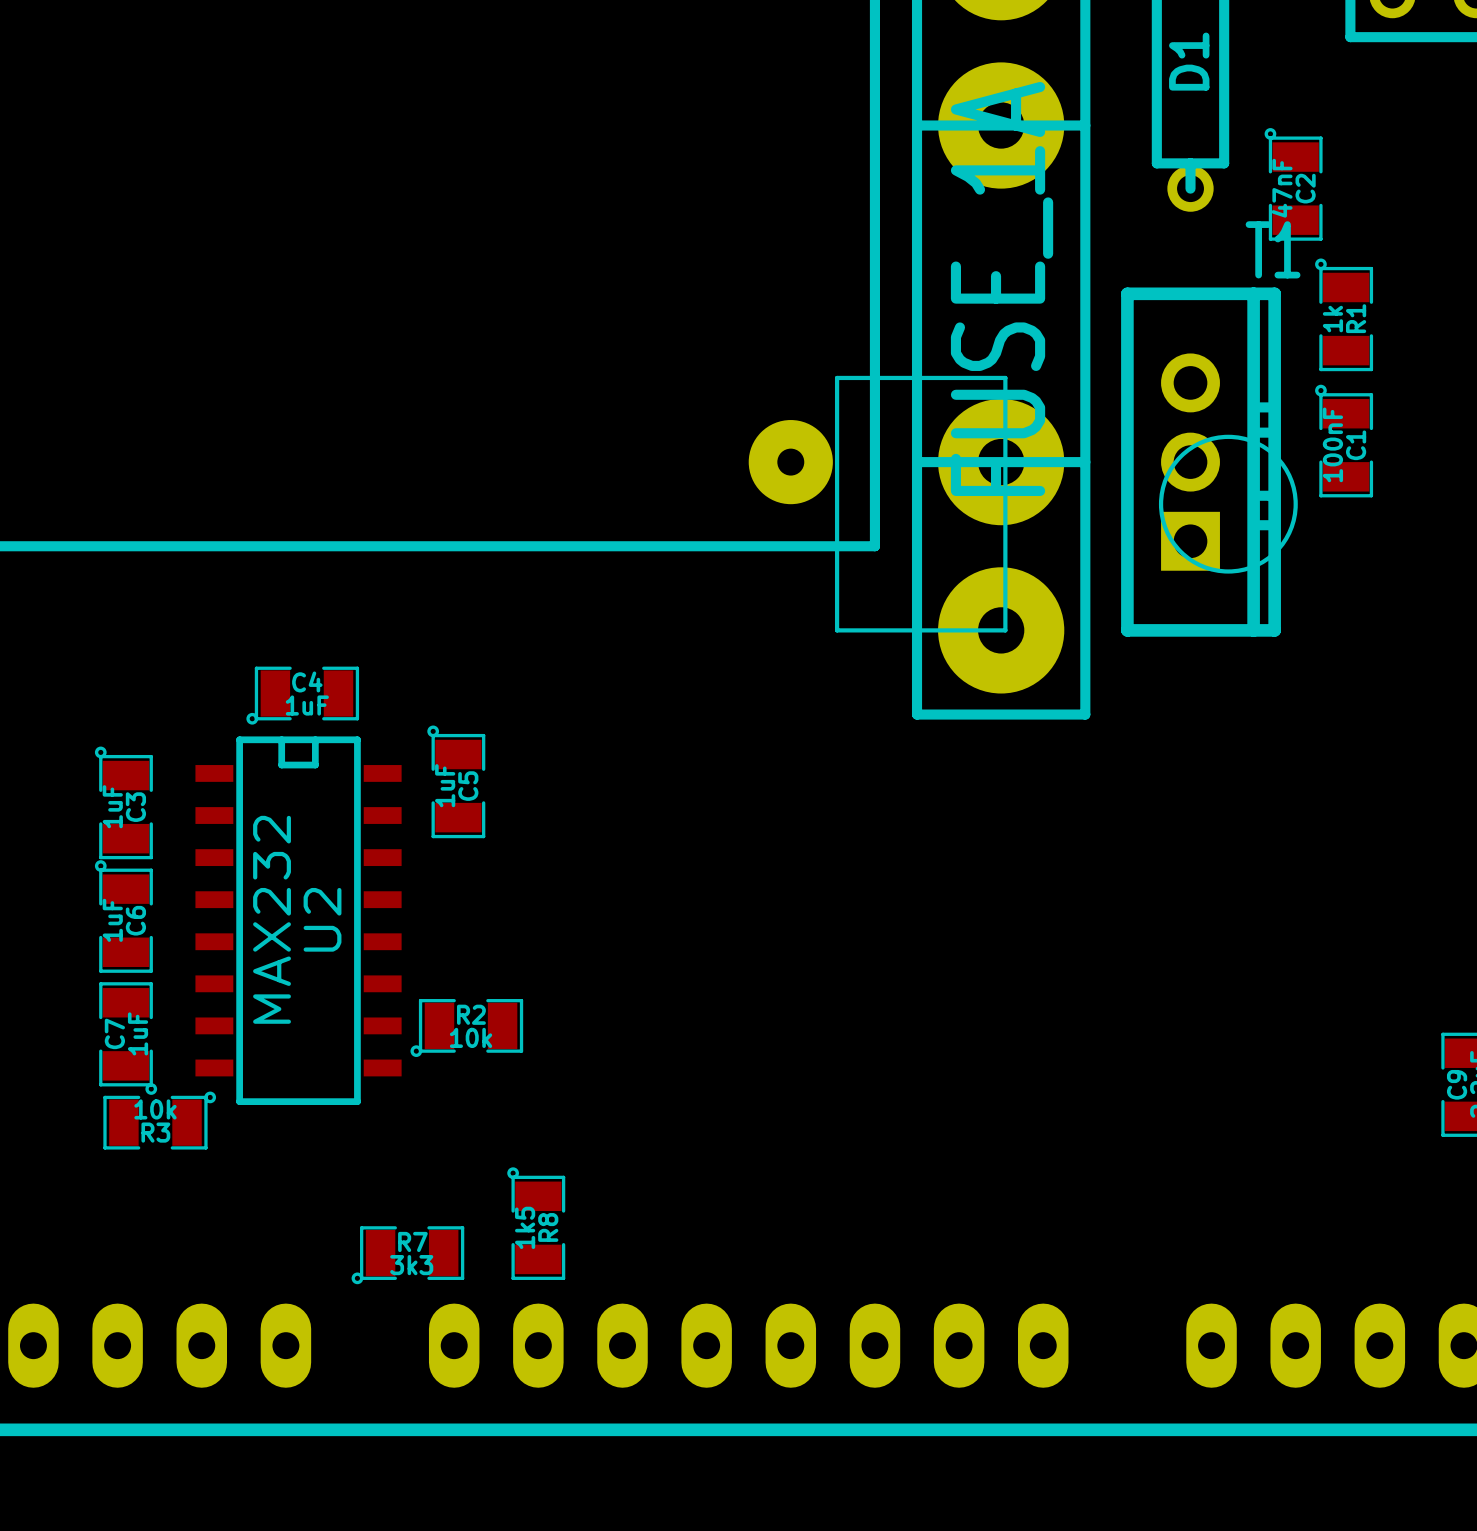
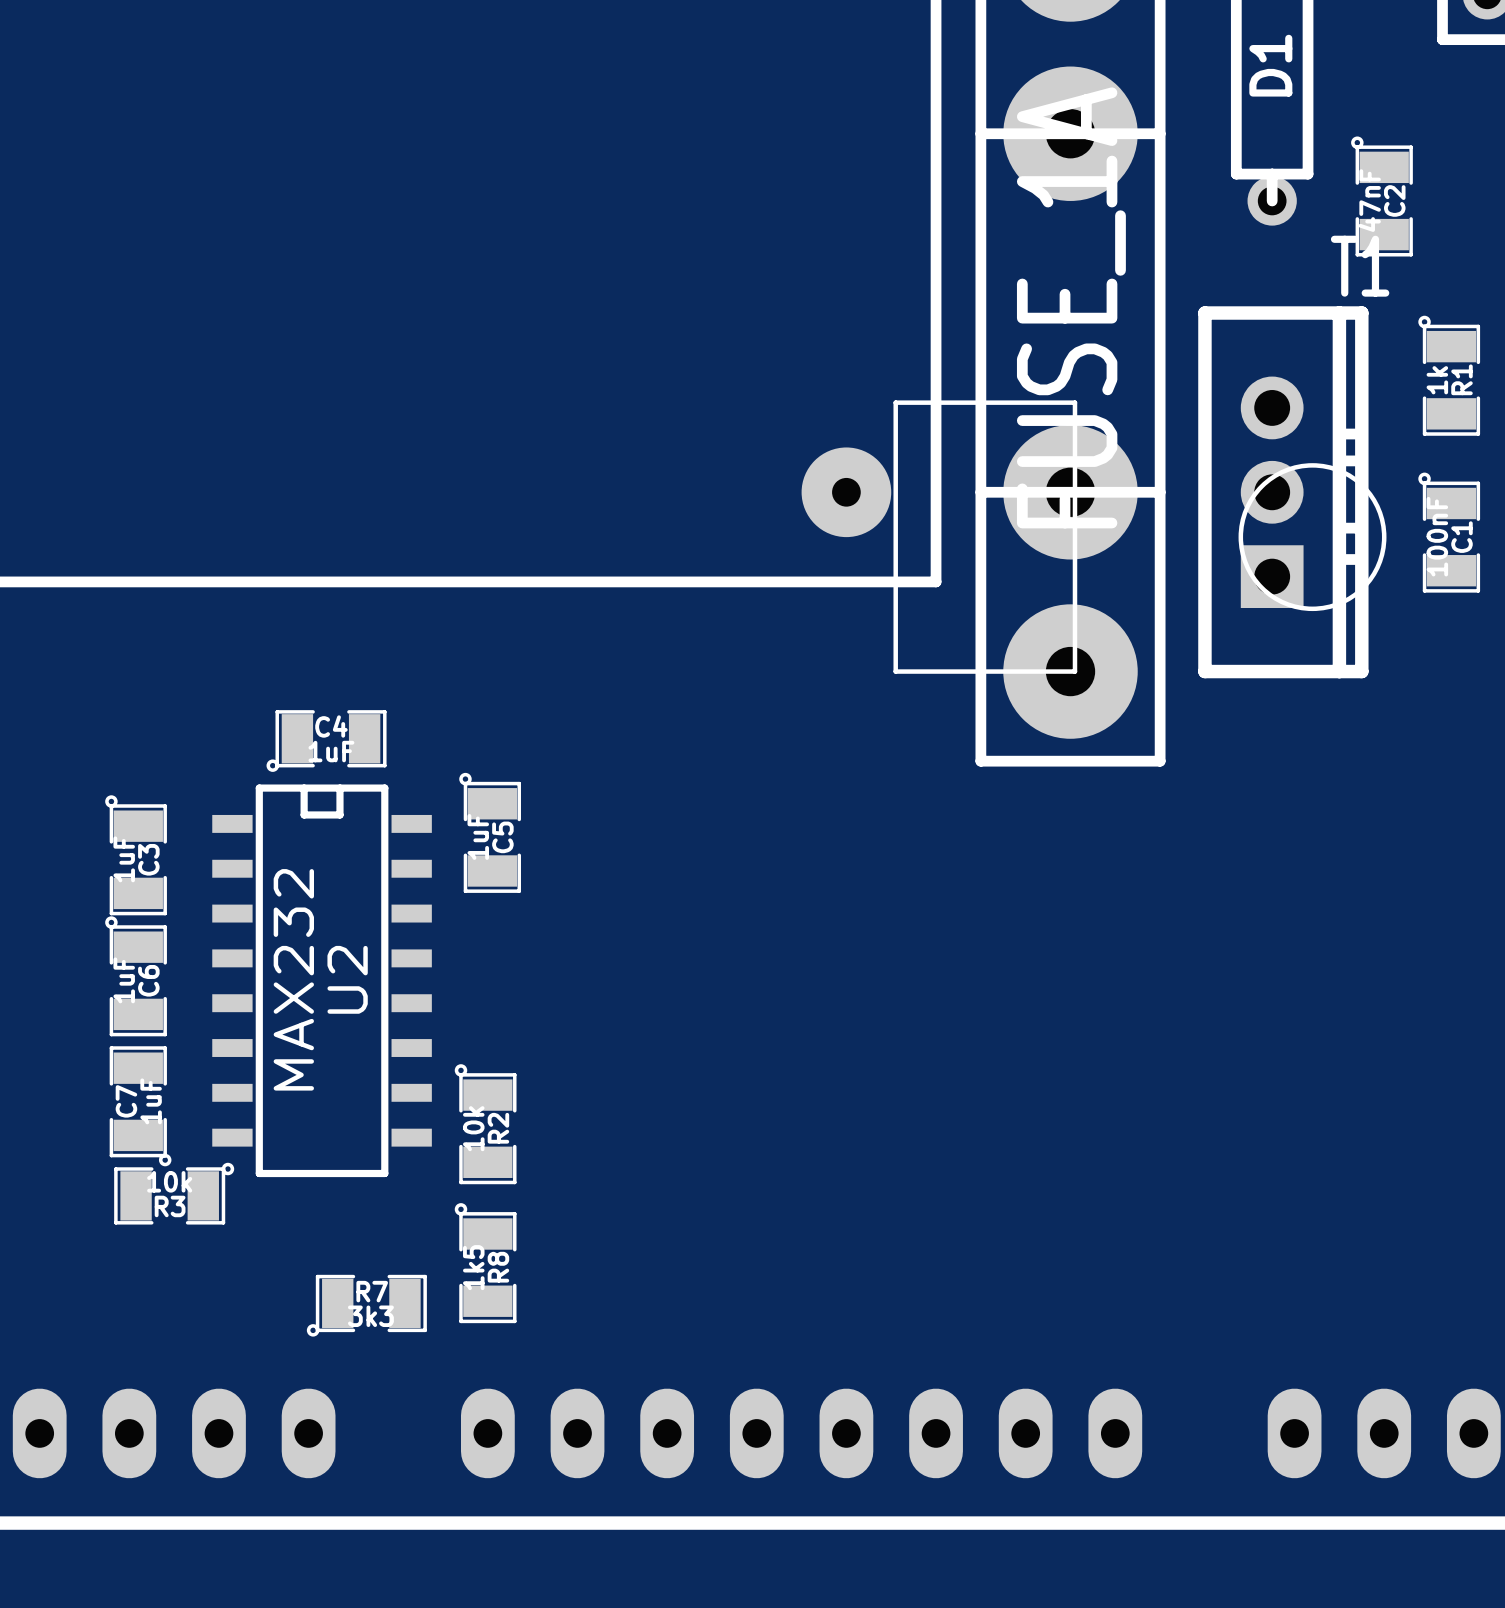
R1 position: (1344, 314) -> (1449, 375)
C1 position: (1344, 441) -> (1449, 532)
R2 rotation: 0° (466, 1028) -> 90° clockwise (485, 1124)
R8 position: (536, 1223) -> (485, 1263)
R7 position: (407, 1255) -> (366, 1305)

